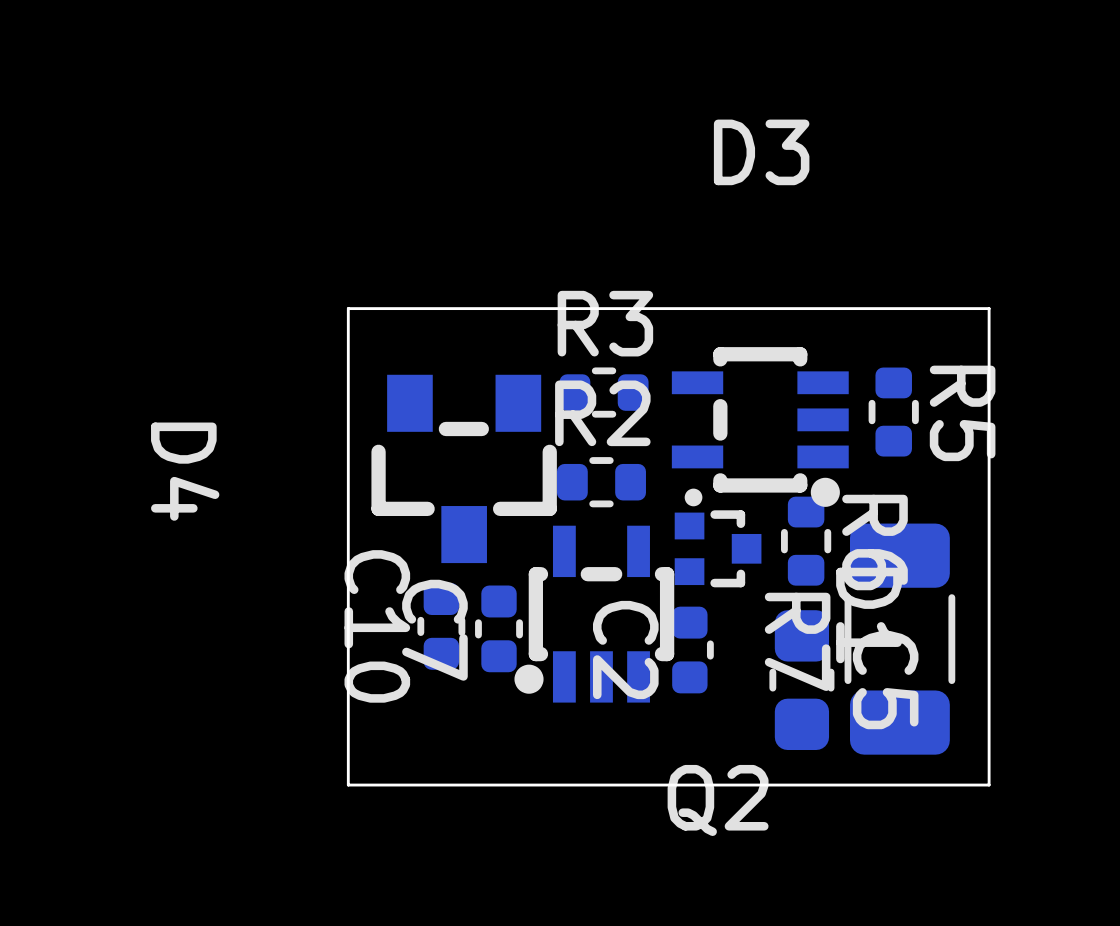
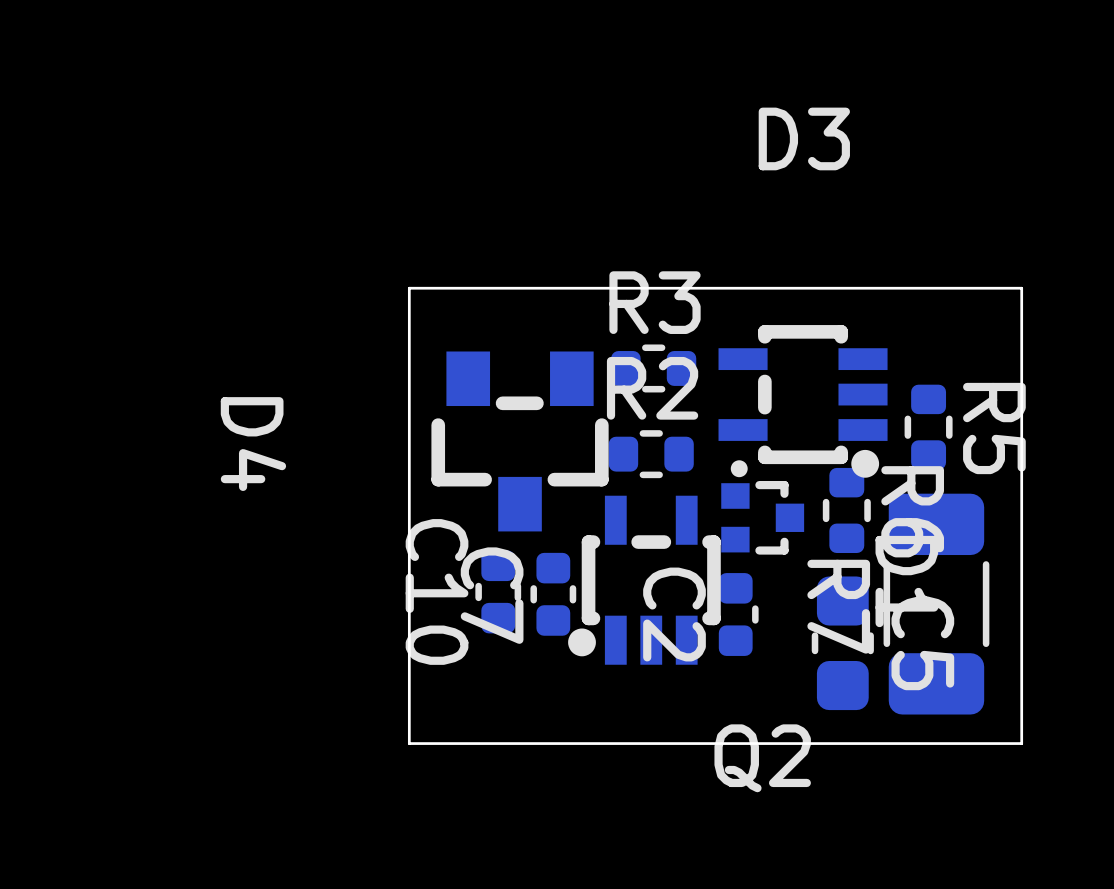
R5 position: (893, 412) -> (928, 427)

